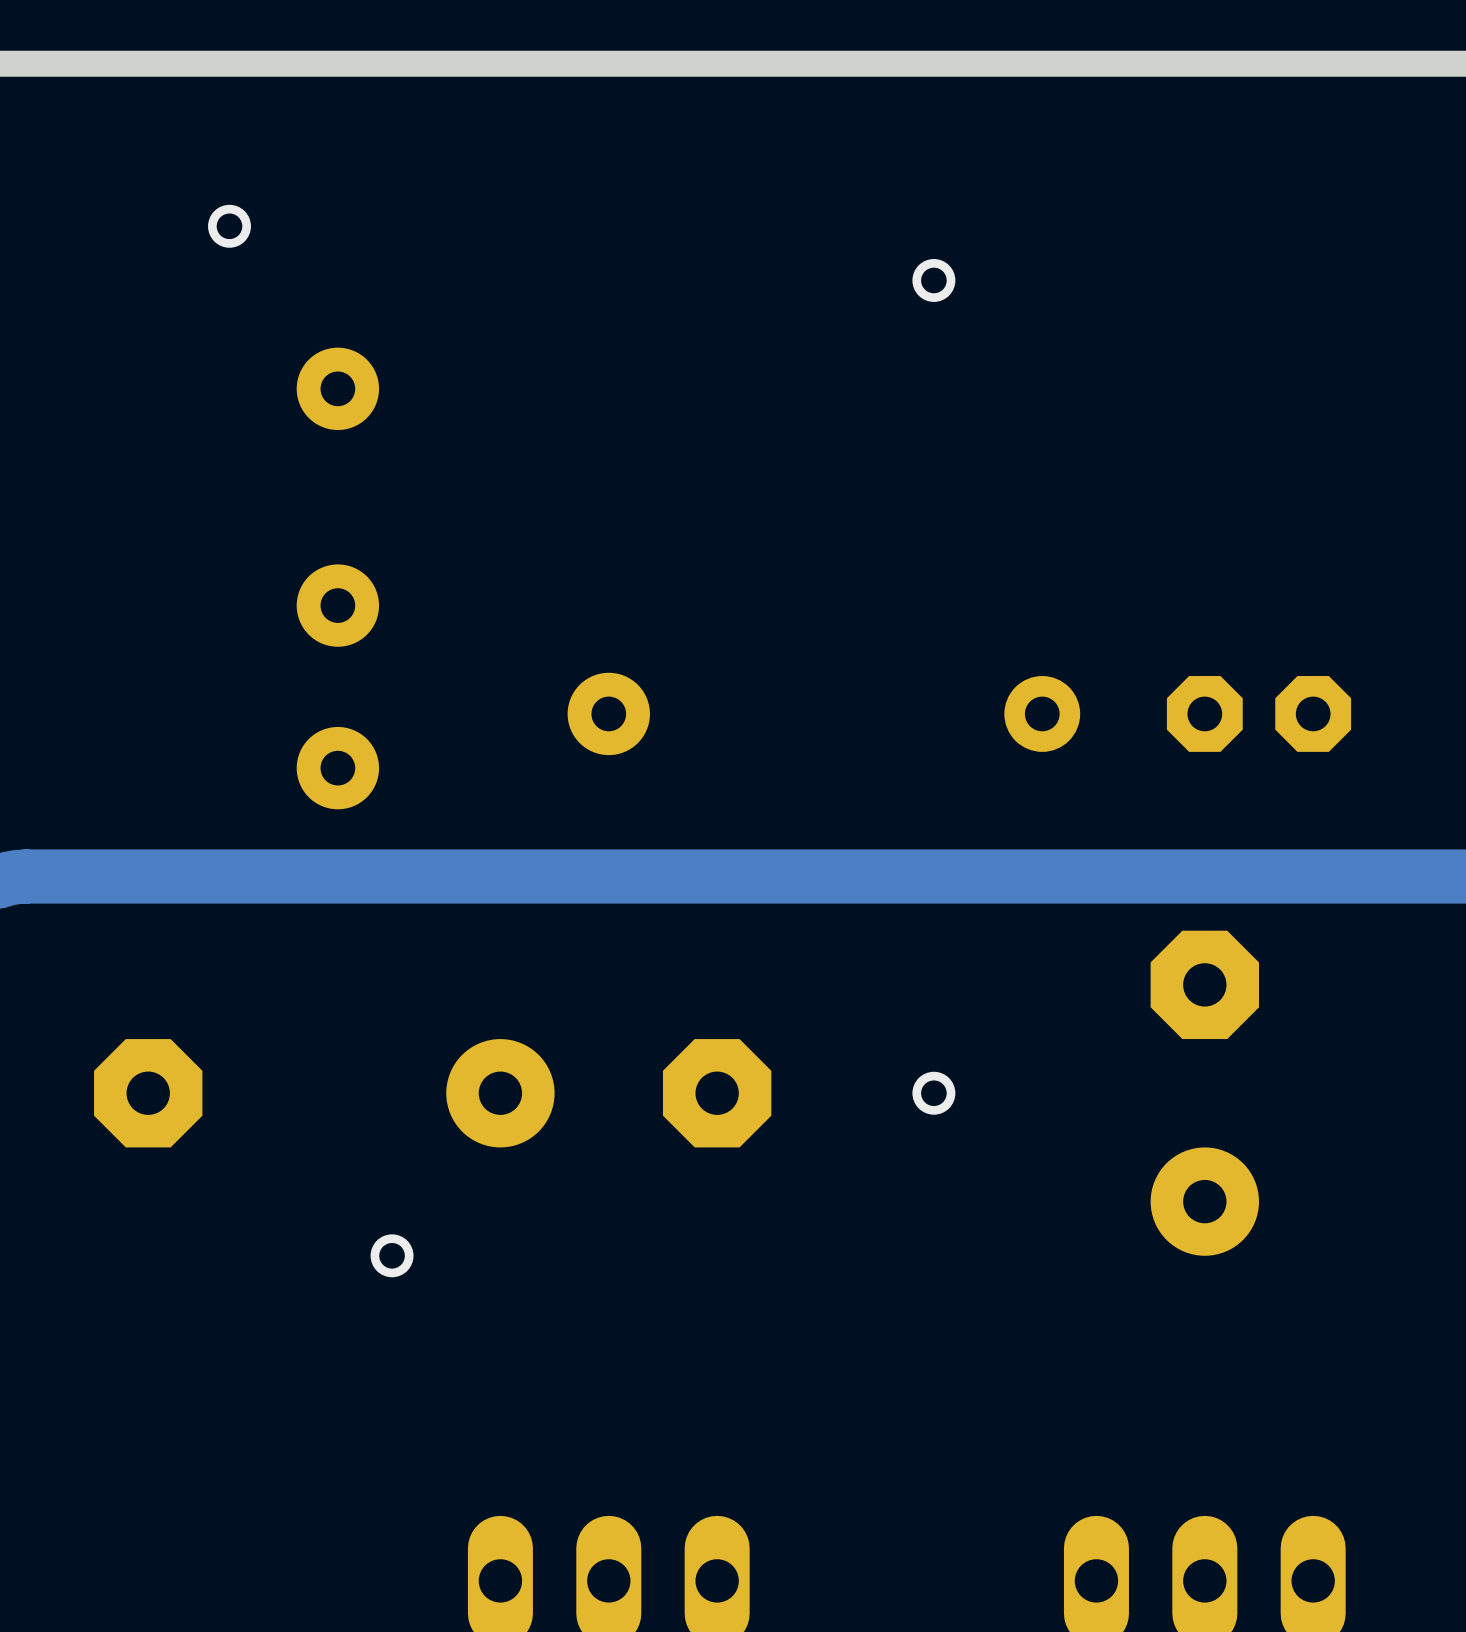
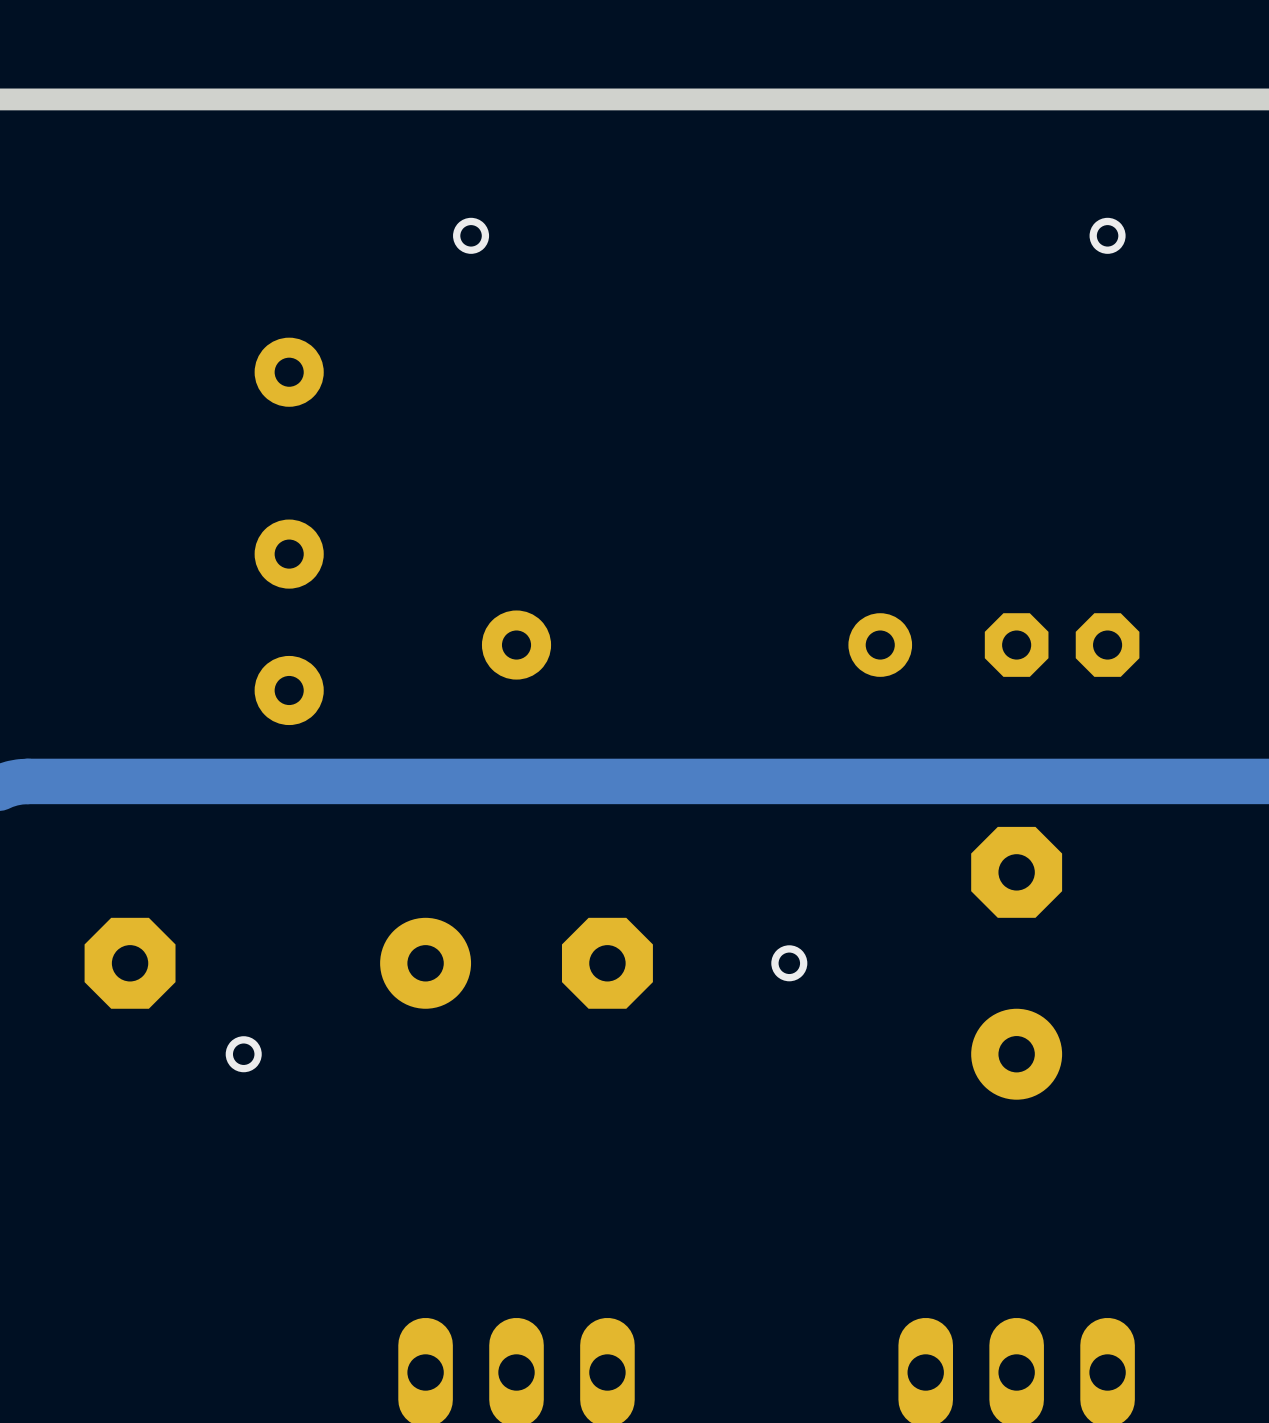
via: (229, 226) -> none
via: none -> (471, 235)
via: none -> (1107, 235)
via: (933, 280) -> none
via position: (392, 1255) -> (243, 1054)

